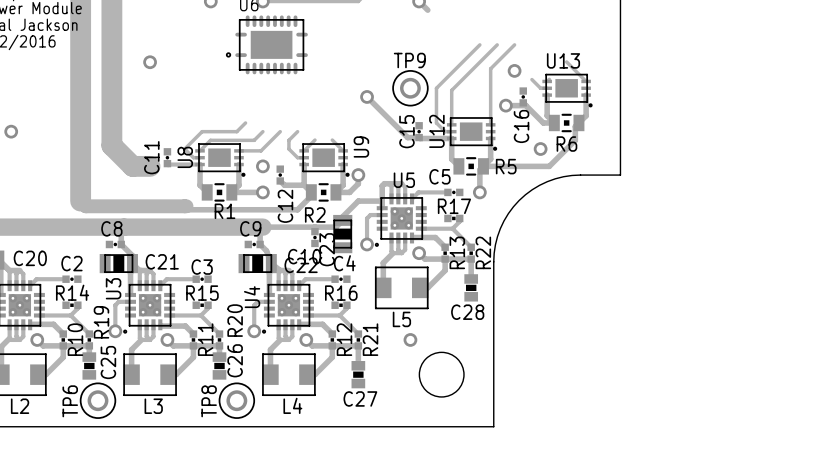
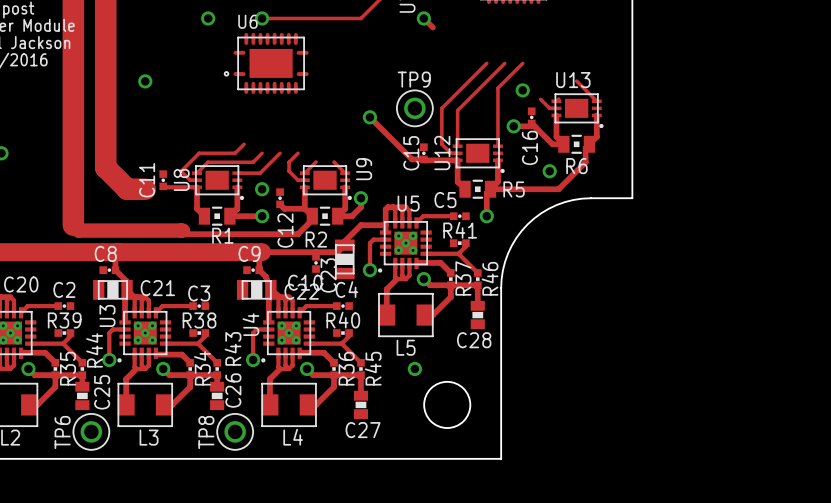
R17 name: R17 (454, 206) -> R41 (460, 230)
R13 name: R13 (457, 252) -> R37 (463, 278)
R22 name: R22 (483, 252) -> R46 (490, 278)
R14 name: R14 (72, 292) -> R39 (64, 320)
R15 name: R15 (202, 293) -> R38 (199, 320)
R16 name: R16 (341, 293) -> R40 (343, 320)
R20 name: R20 (235, 320) -> R43 (233, 348)
R19 name: R19 (101, 322) -> R44 (94, 350)
R10 name: R10 (75, 339) -> R35 (67, 368)
R11 name: R11 (205, 339) -> R34 (202, 368)
R12 name: R12 (344, 339) -> R36 (346, 368)
R21 name: R21 (370, 339) -> R45 (373, 368)

